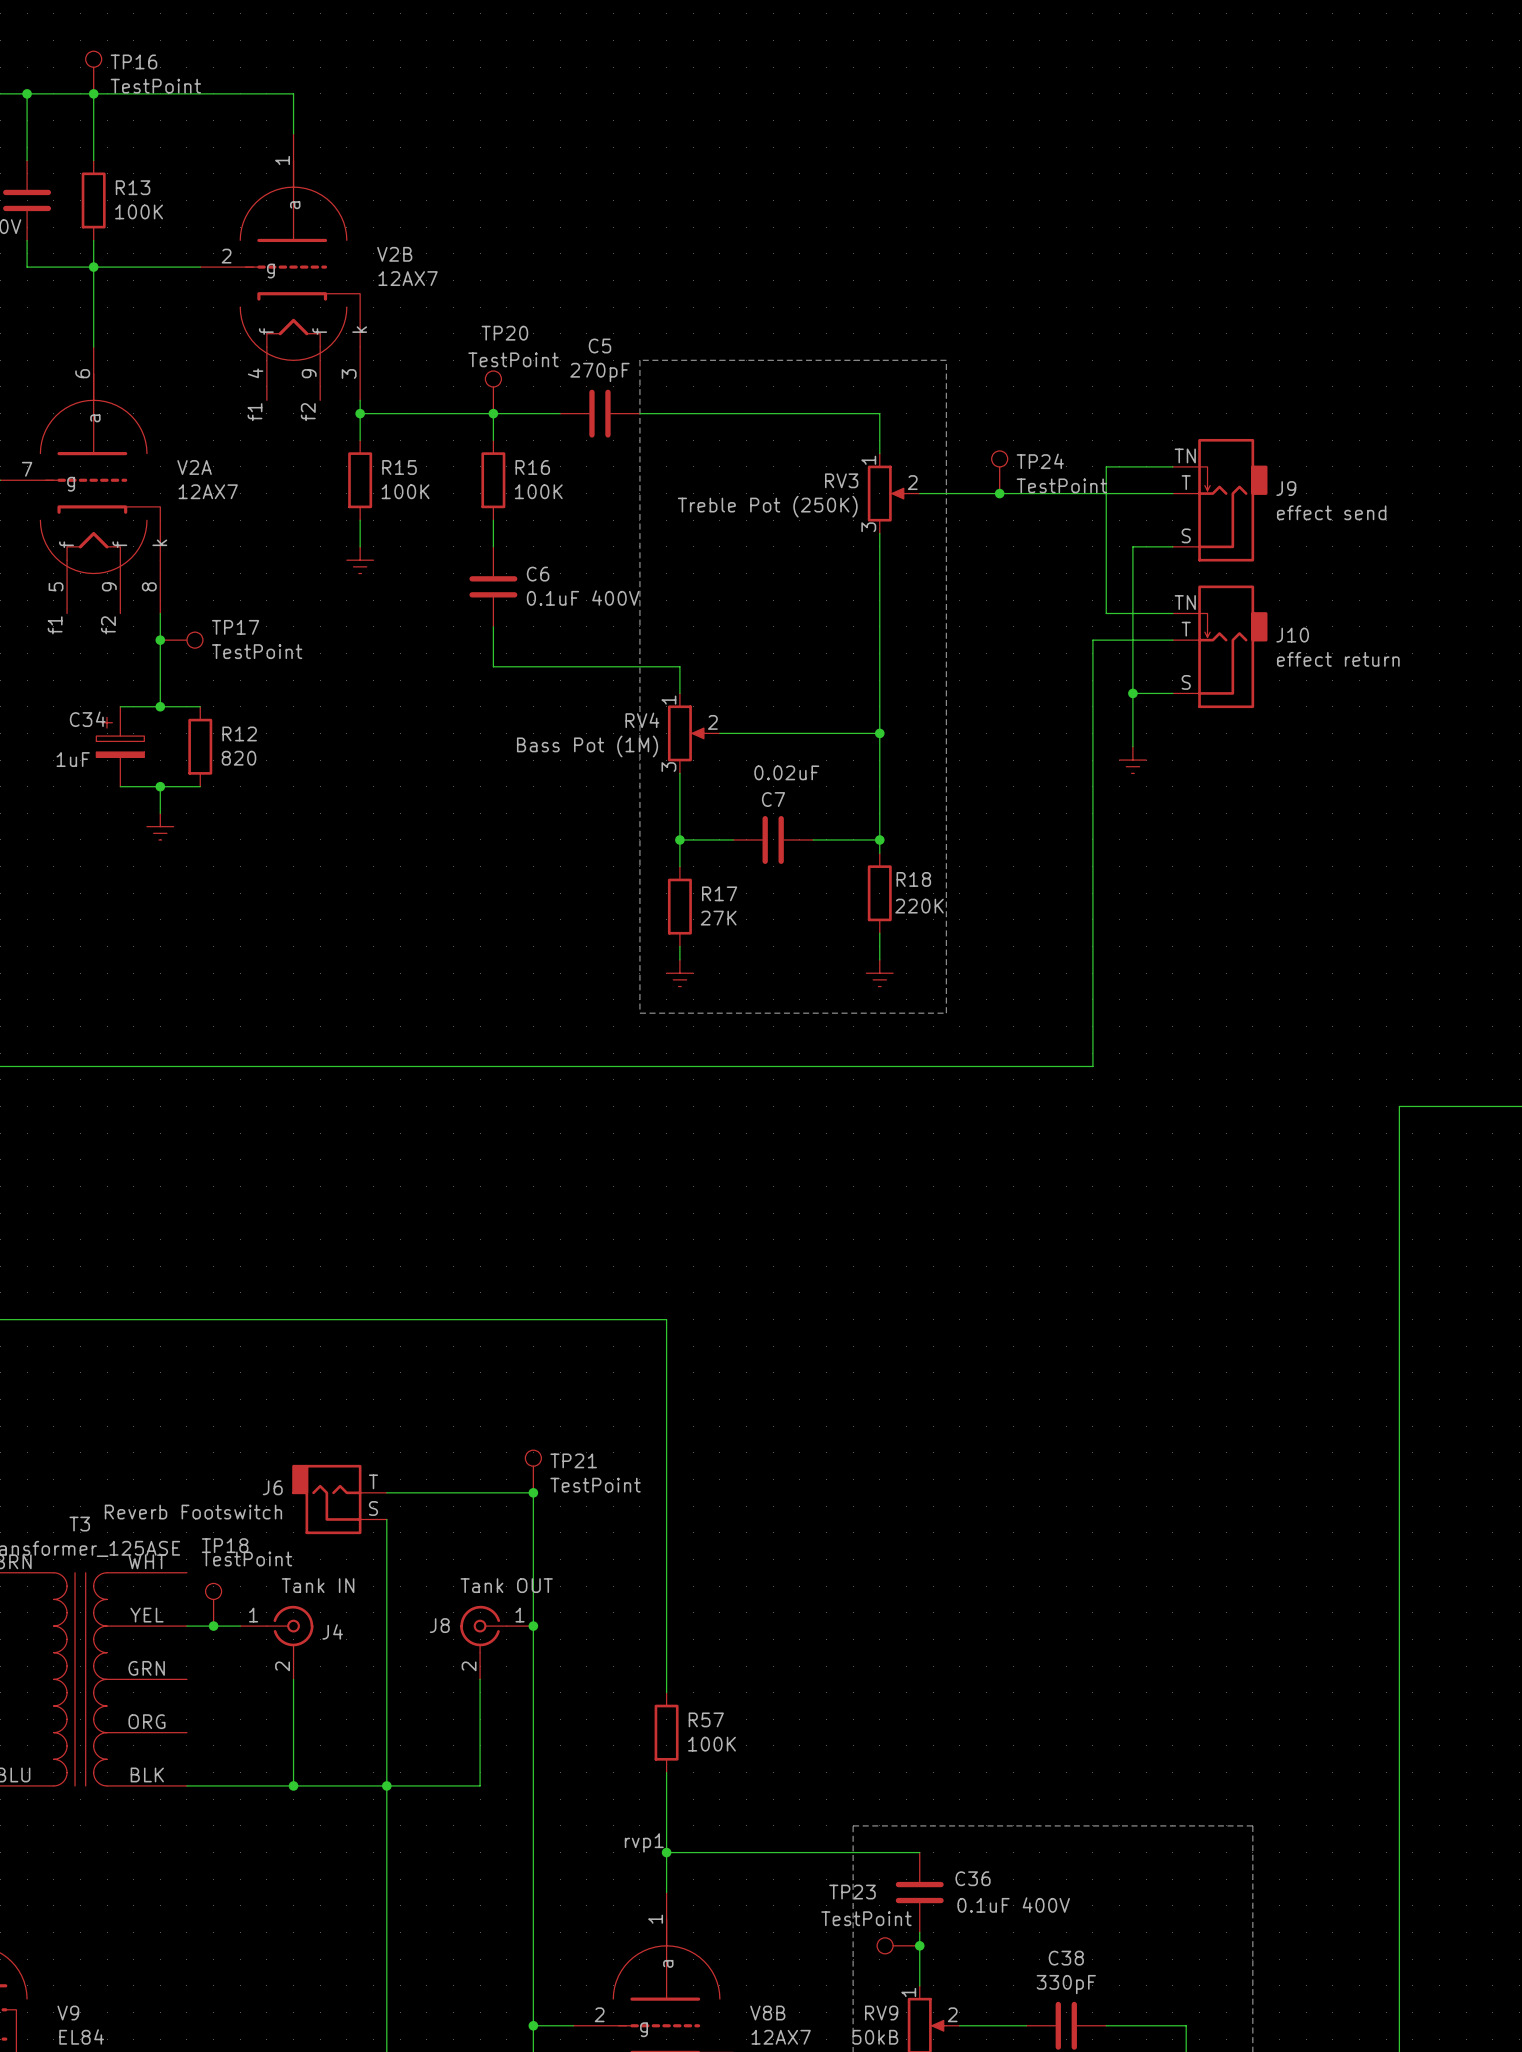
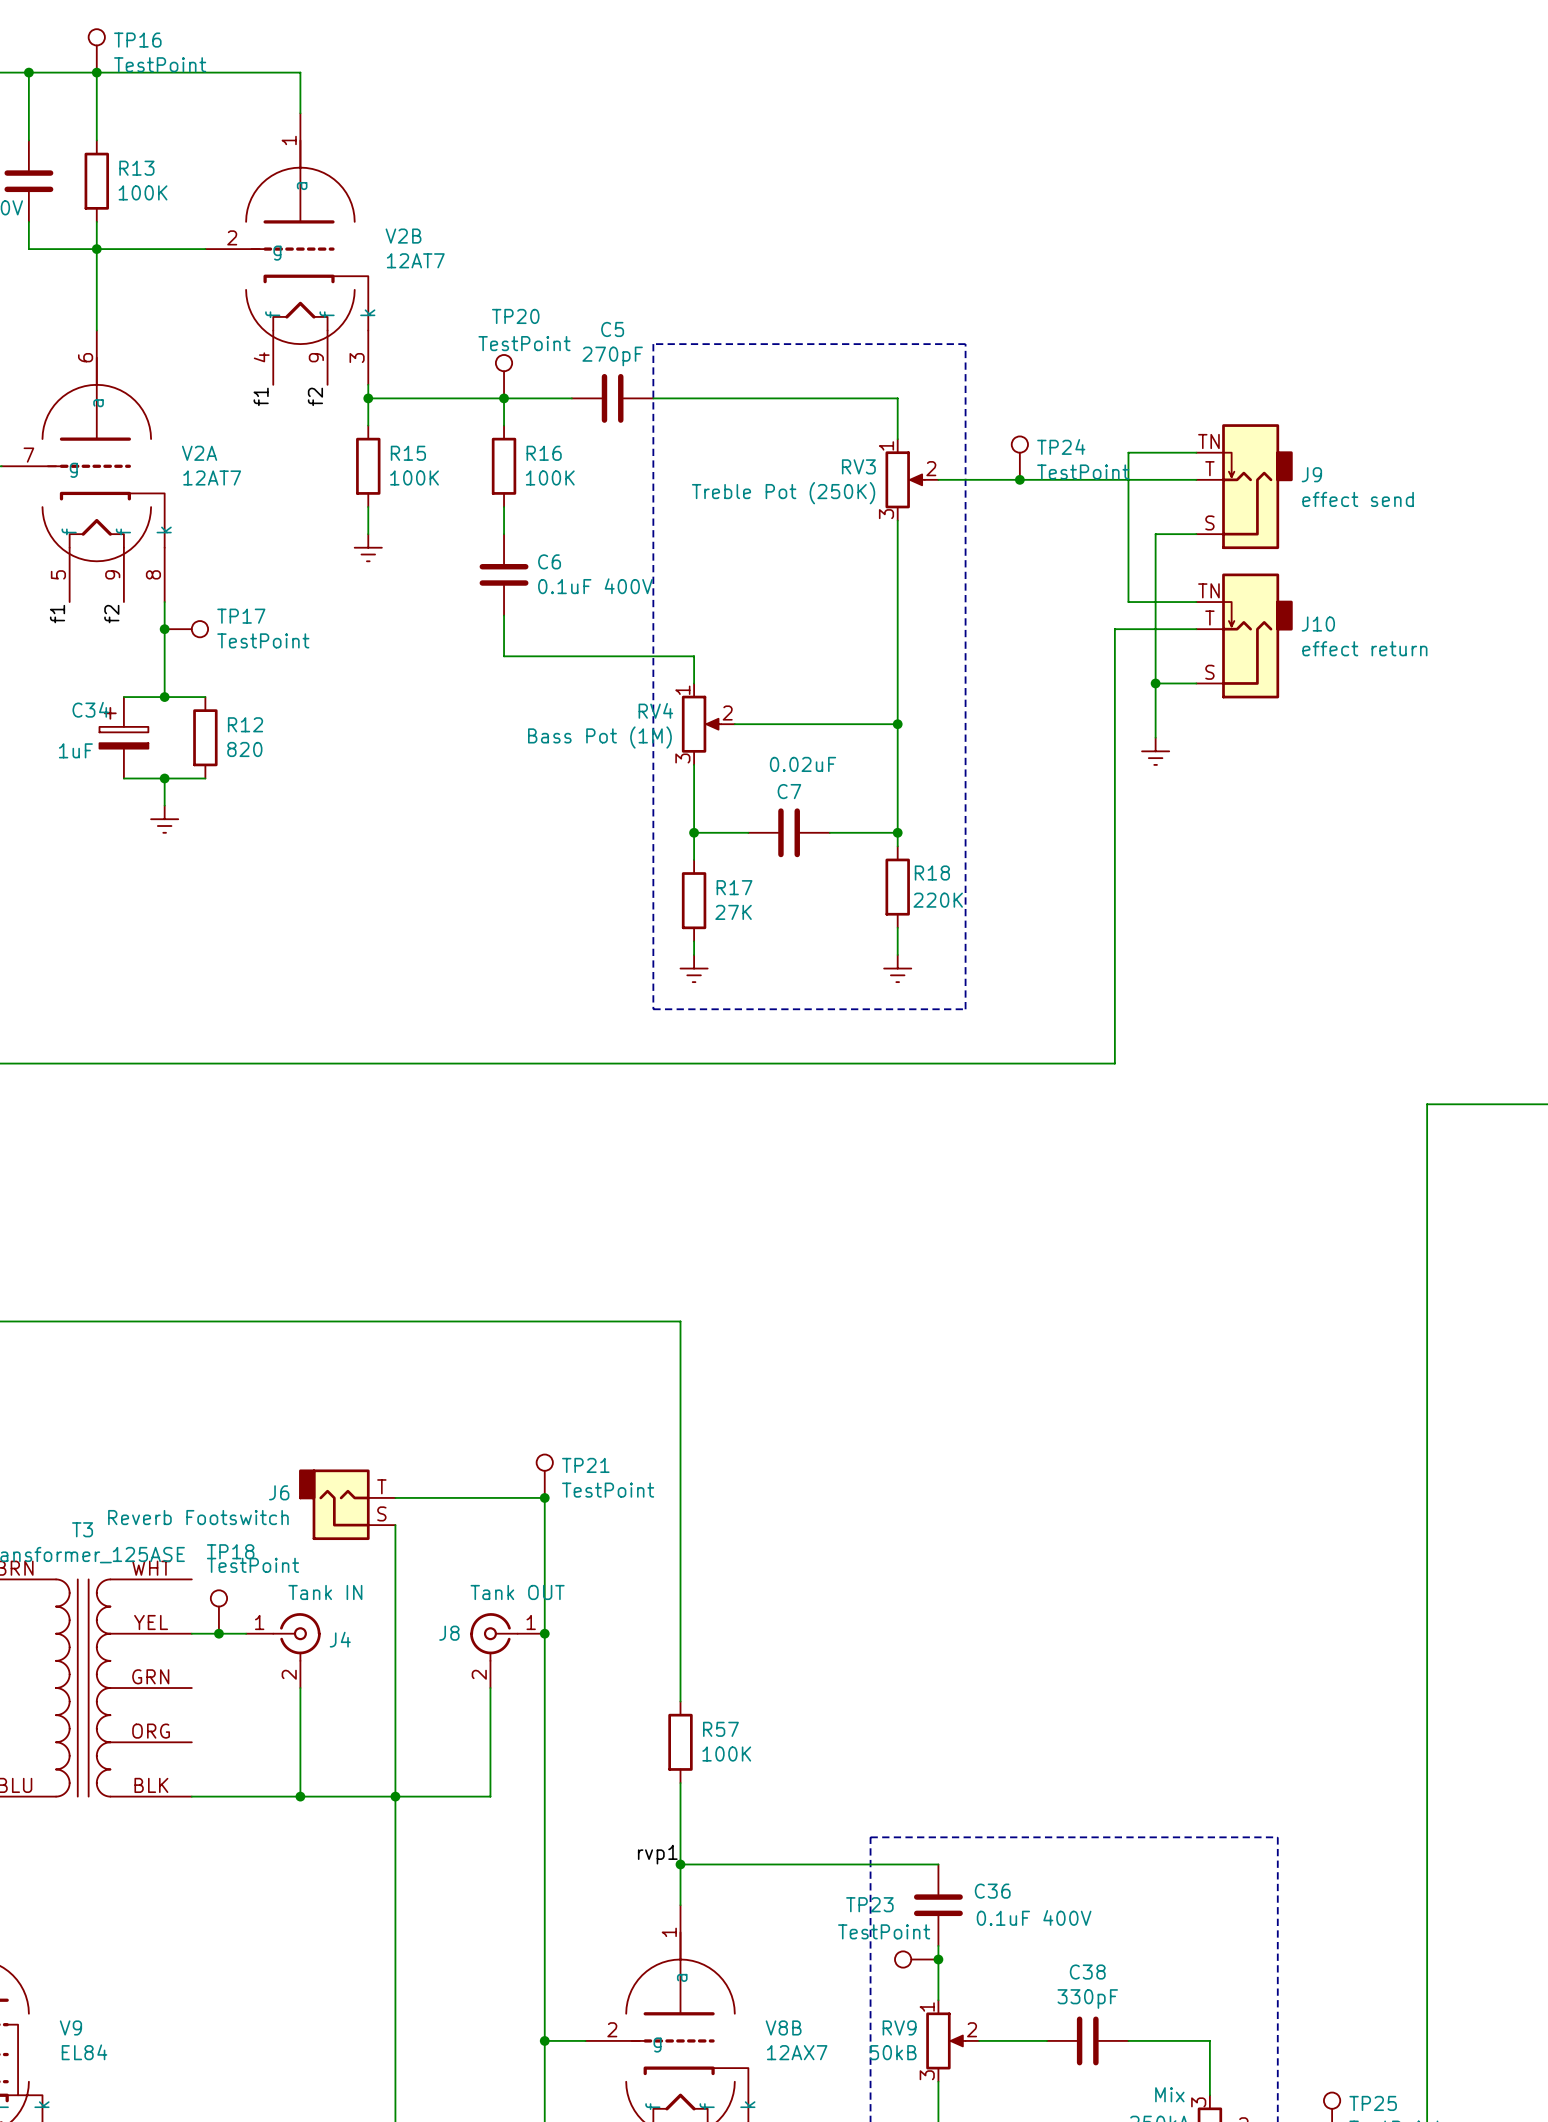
V2B value: 12AX7 (408, 278) -> 12AT7 (415, 260)
V2A value: 12AX7 (208, 491) -> 12AT7 (212, 477)

